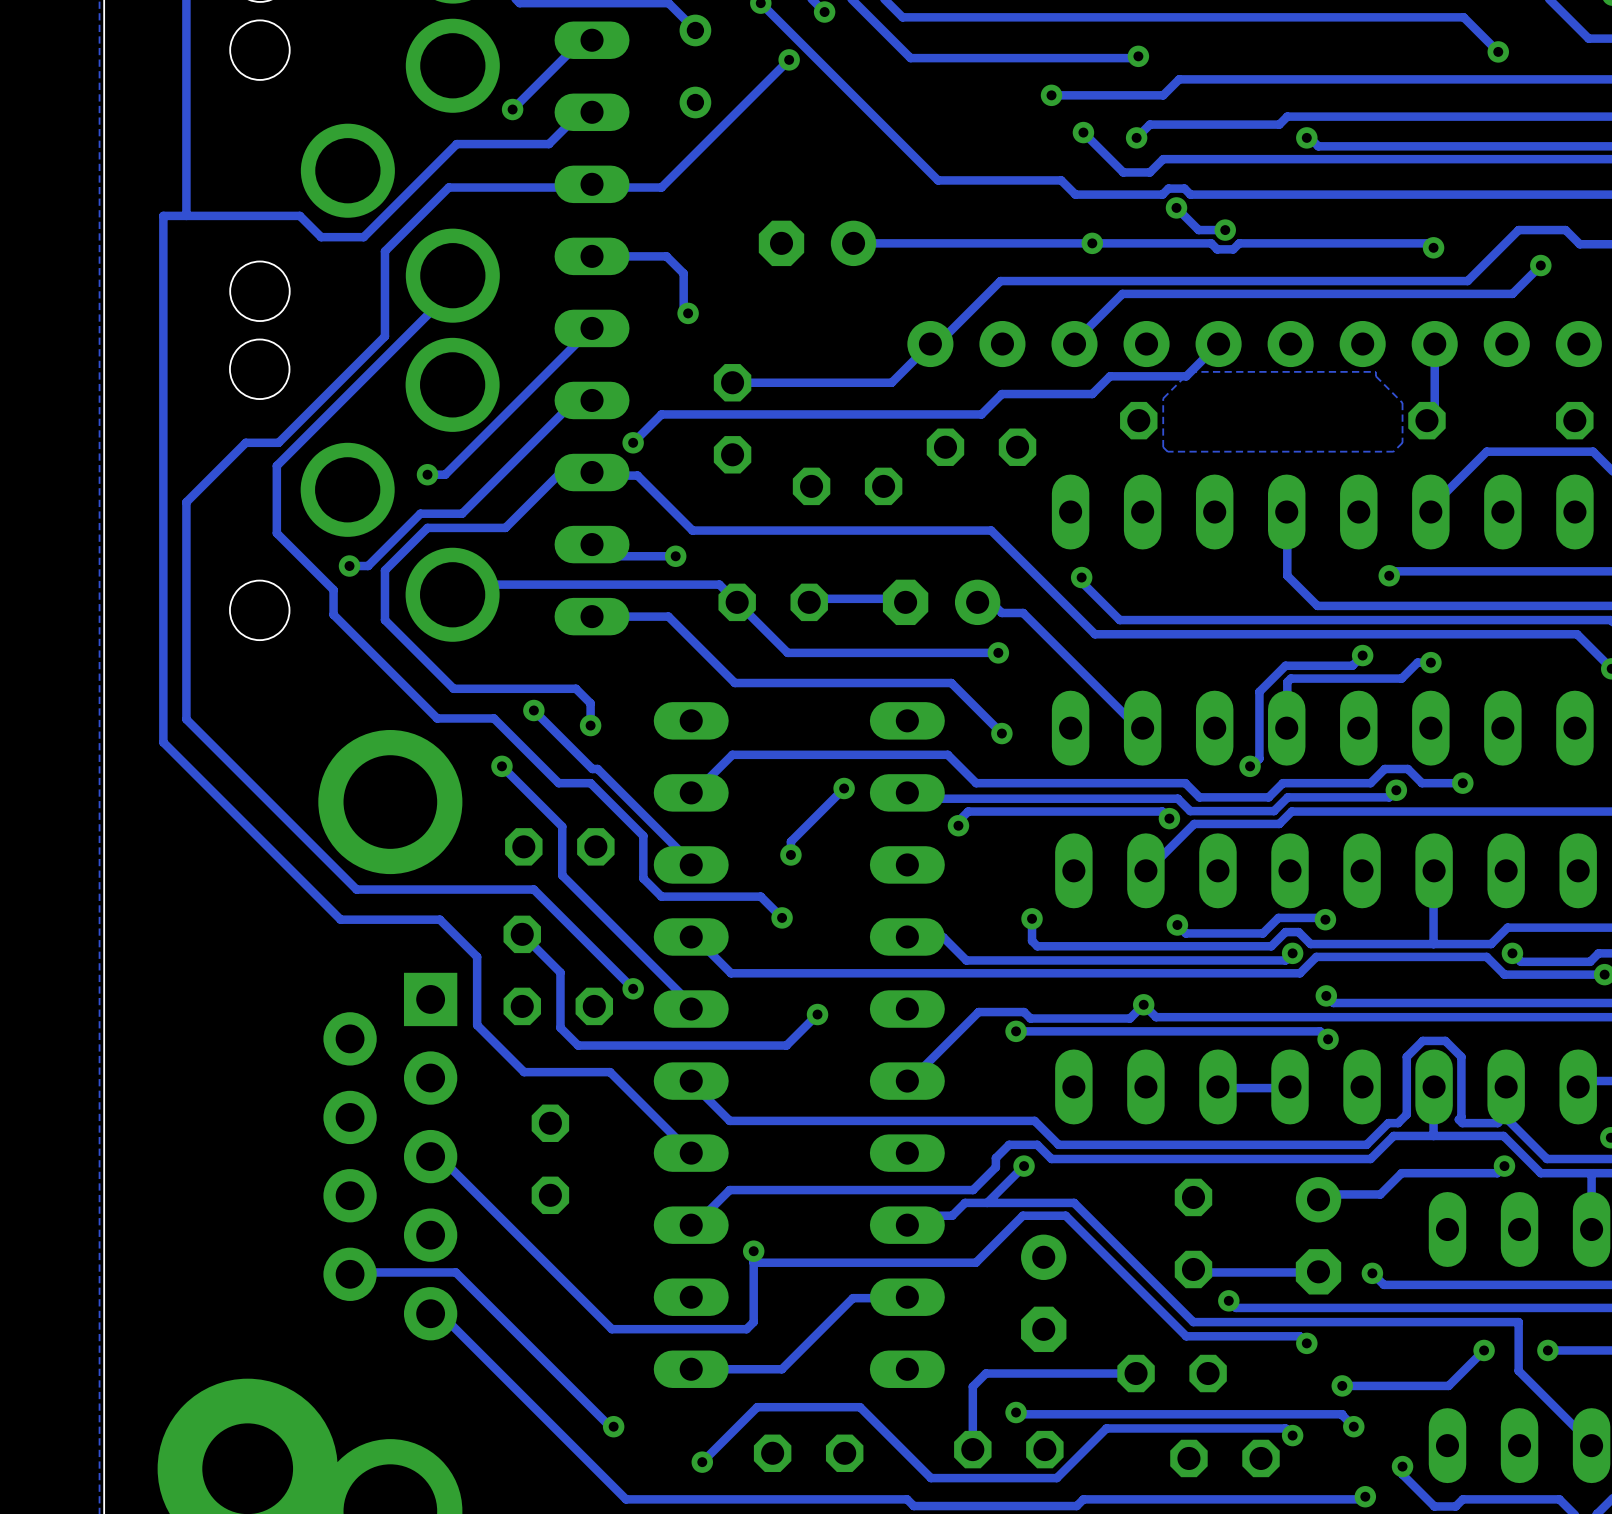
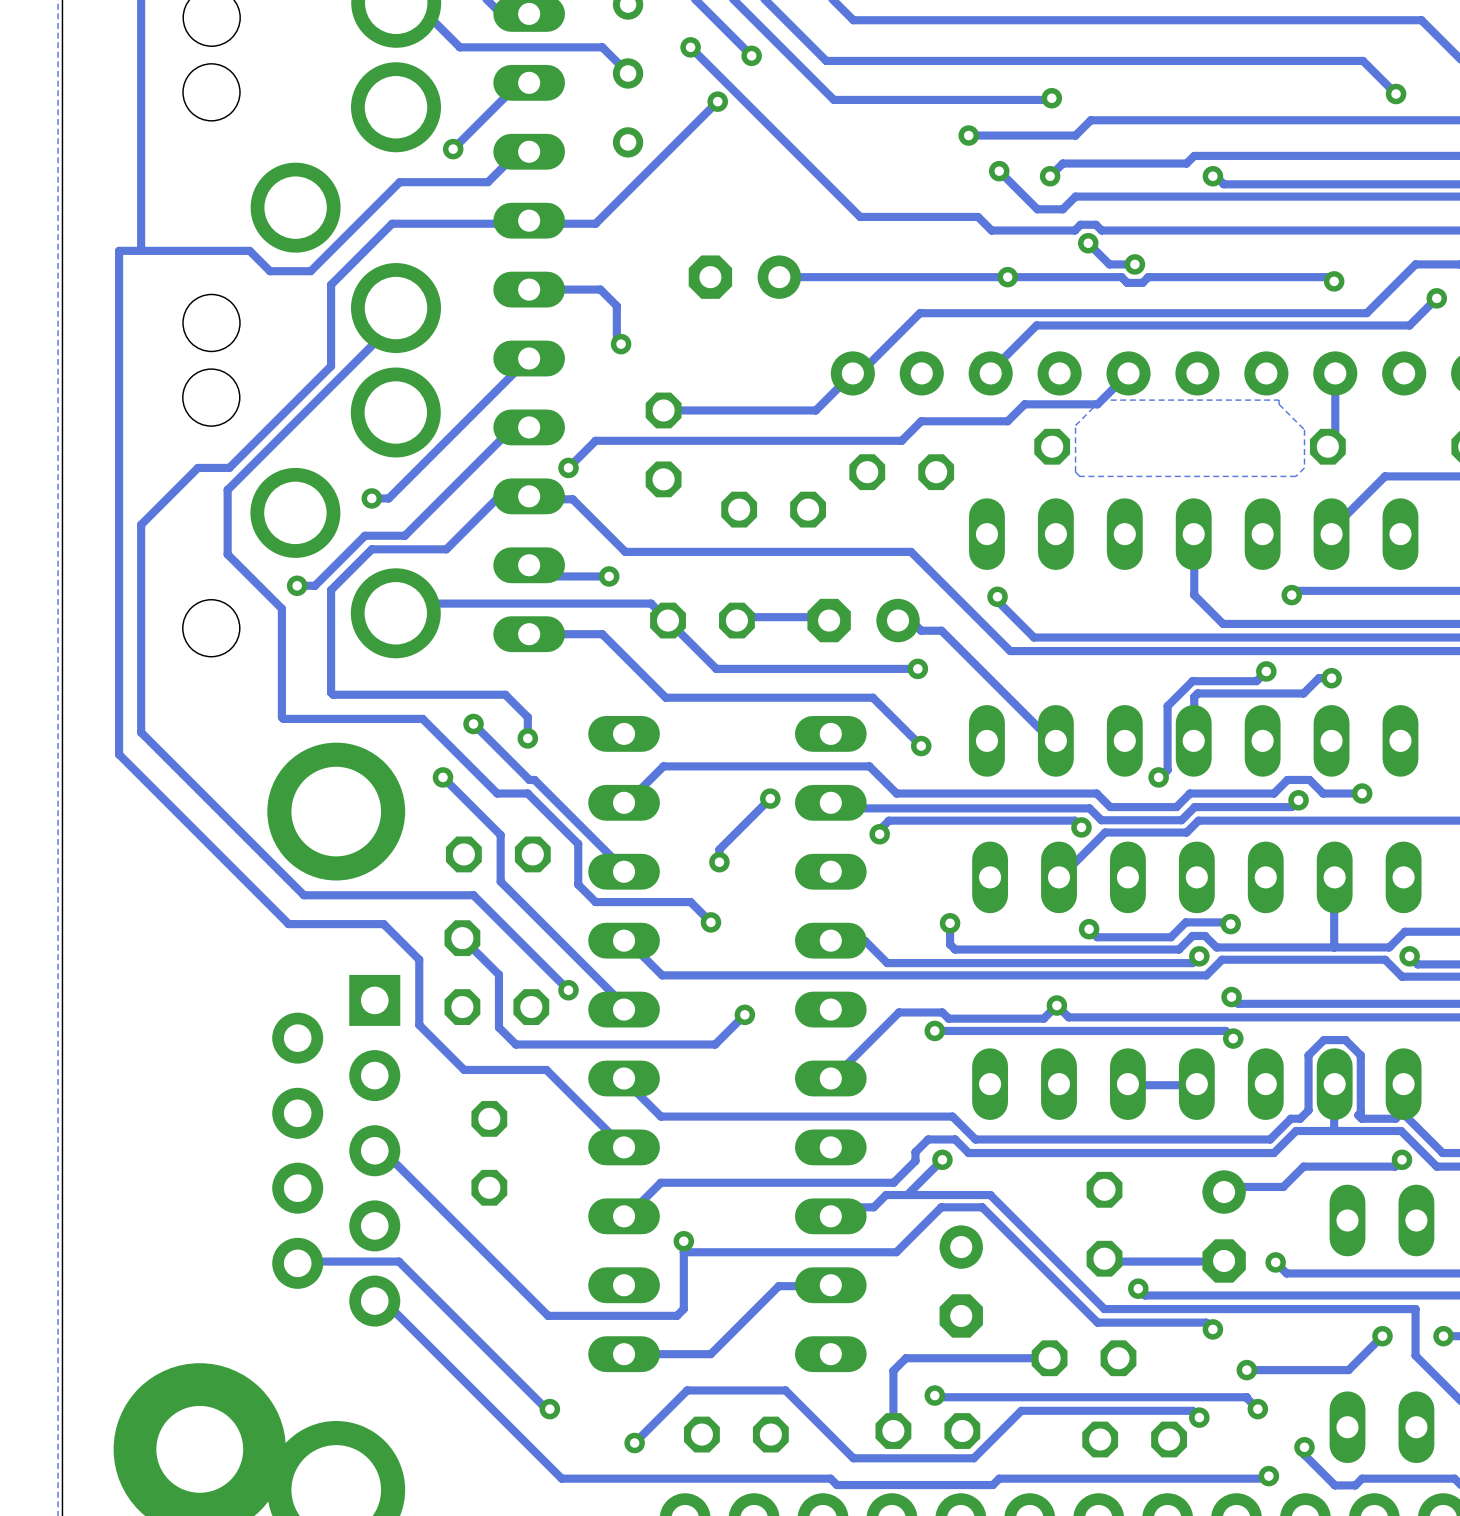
track: (333, 614) (437, 718) (493, 718) -> (281, 632) (281, 717) (283, 718) (422, 718) (435, 731)
track: (384, 620) (453, 688) (575, 688) -> (331, 637) (331, 692) (333, 694) (505, 694) (513, 703)

